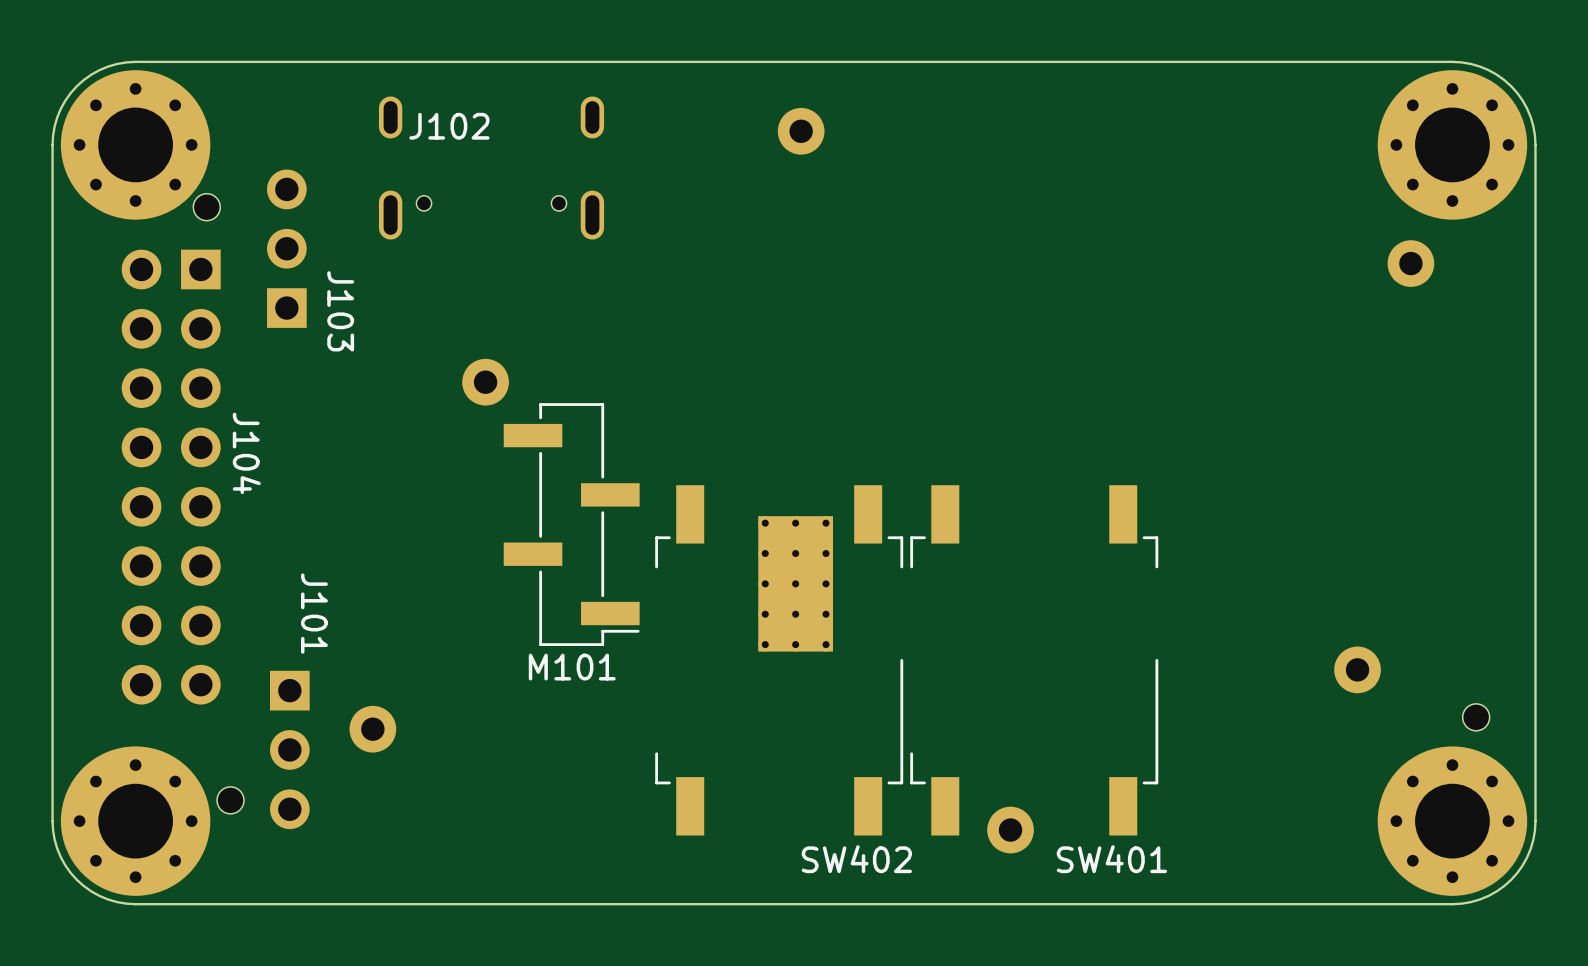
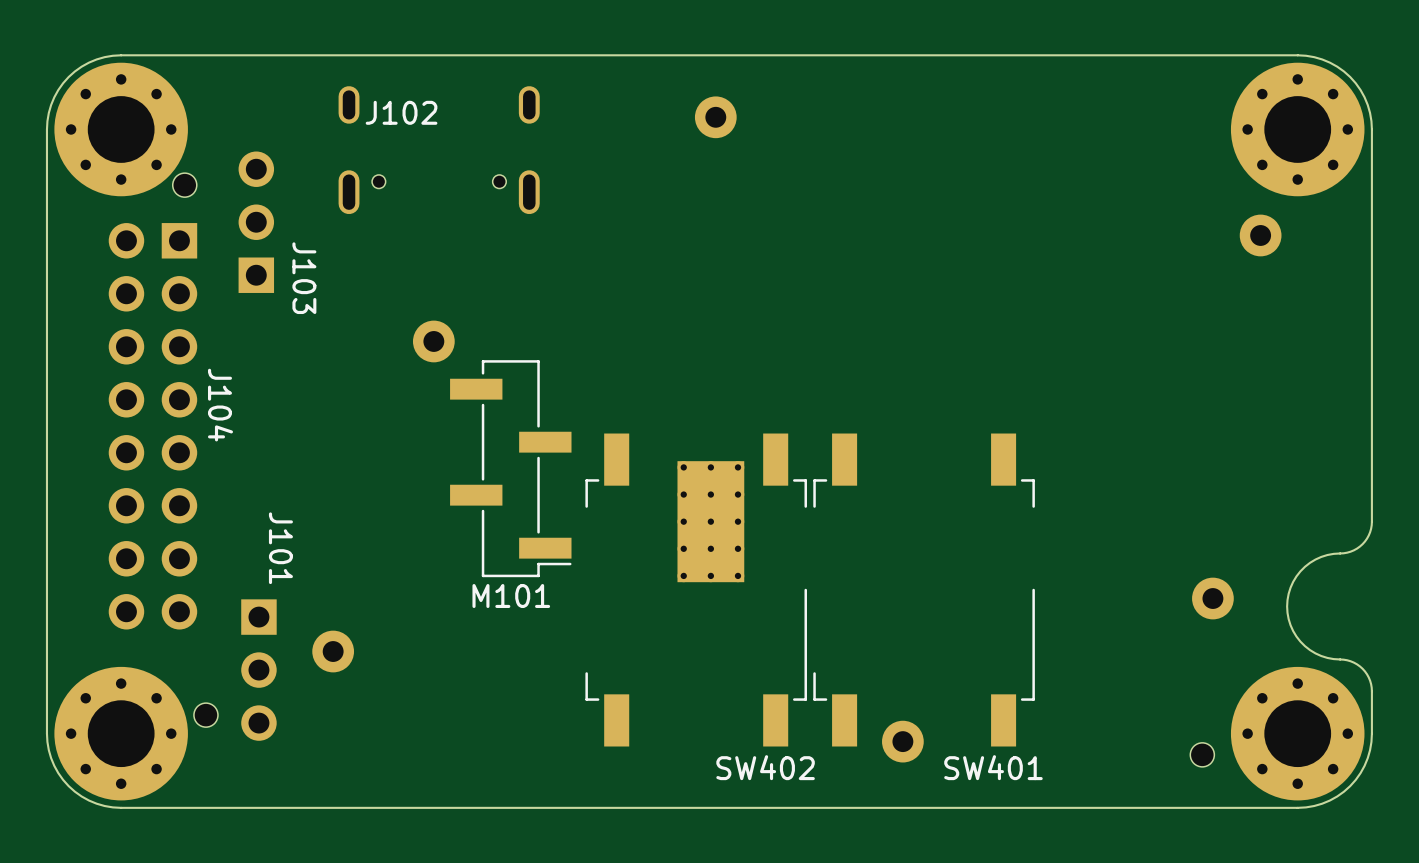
board edge: (1535, 583) (1535, 773) -> (1371, 521) (1368, 535) (1357, 548) (1347, 552) (1321, 556) (1310, 562) (1300, 571) (1290, 587) (1287, 606) (1288, 619) (1293, 631) (1304, 646) (1321, 656) (1347, 660) (1357, 664) (1367, 674) (1371, 691)
part position: (1476, 717) -> (1202, 754)

